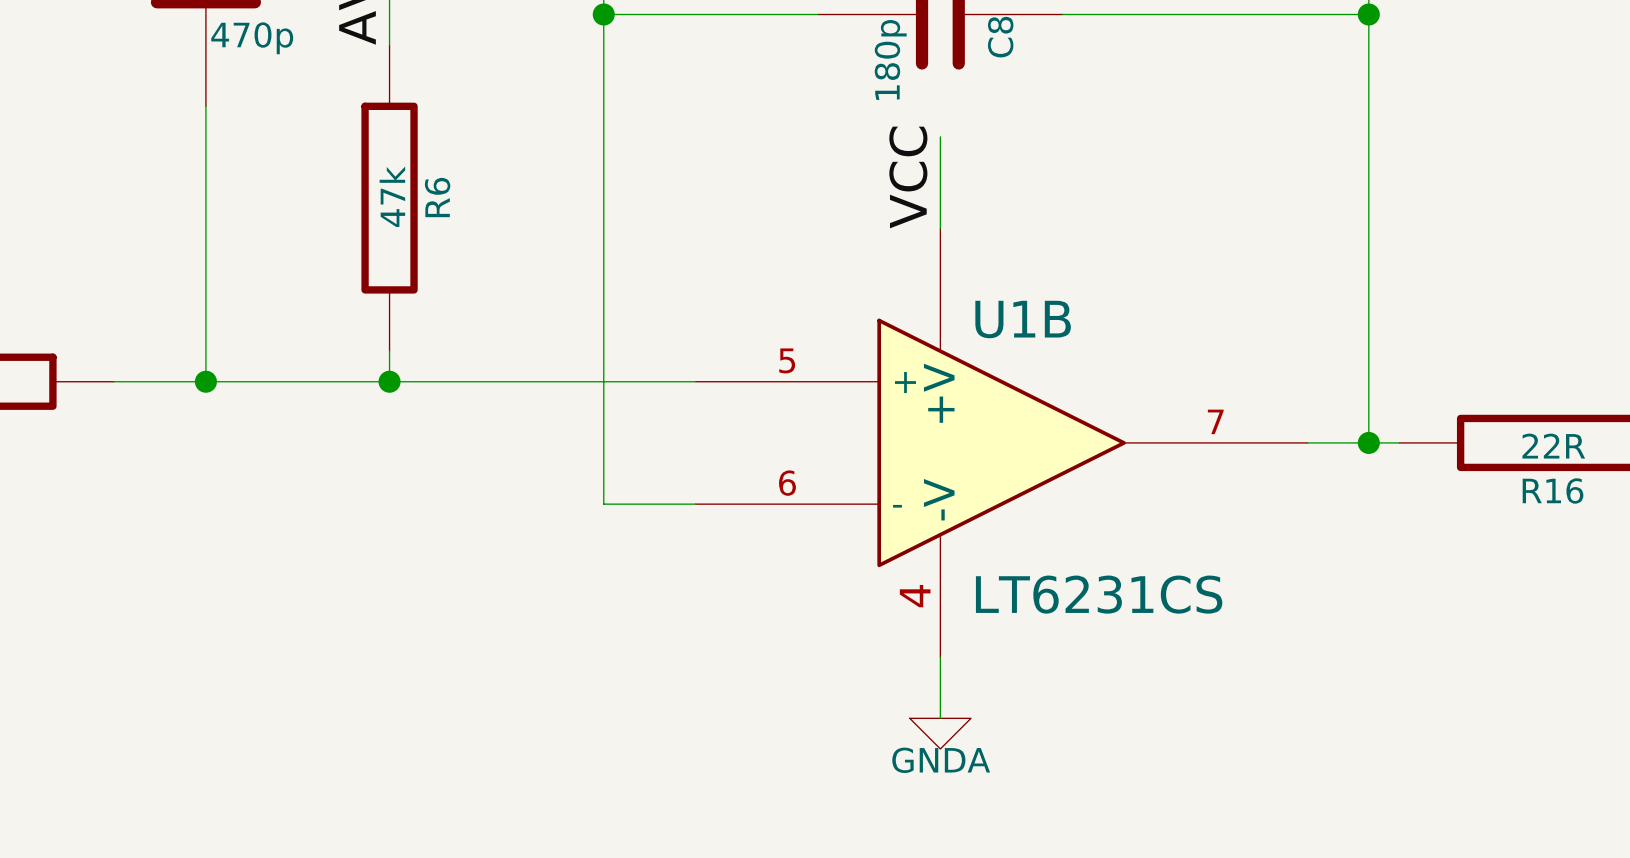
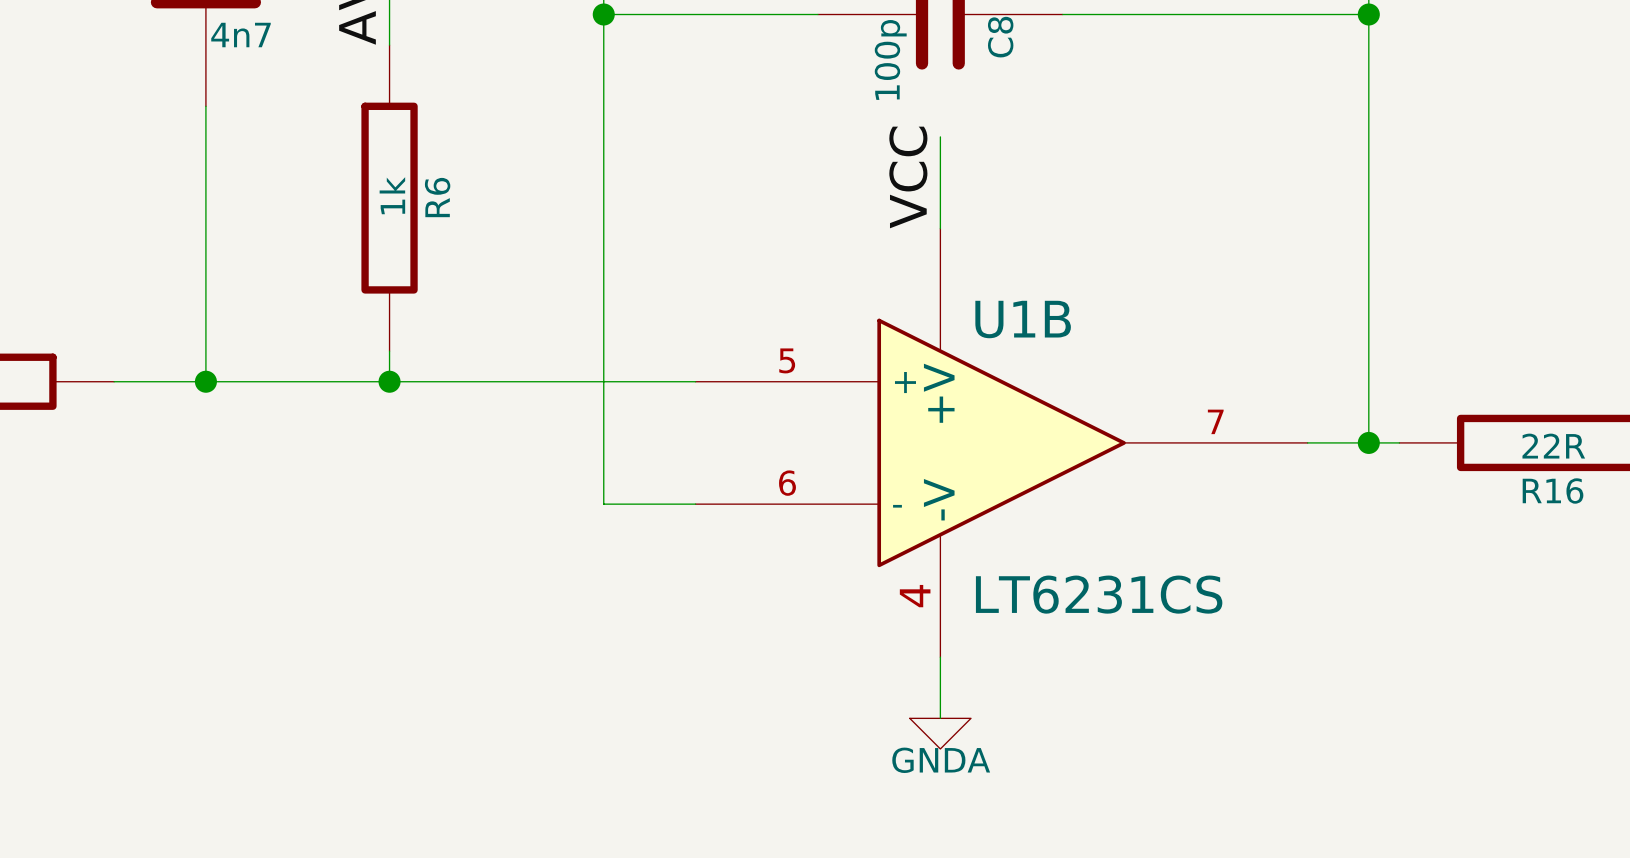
part value: 470p (252, 38) -> 4n7 (240, 35)
C8 value: 180p (890, 59) -> 100p (890, 59)
R6 value: 47k (392, 196) -> 1k (392, 195)

